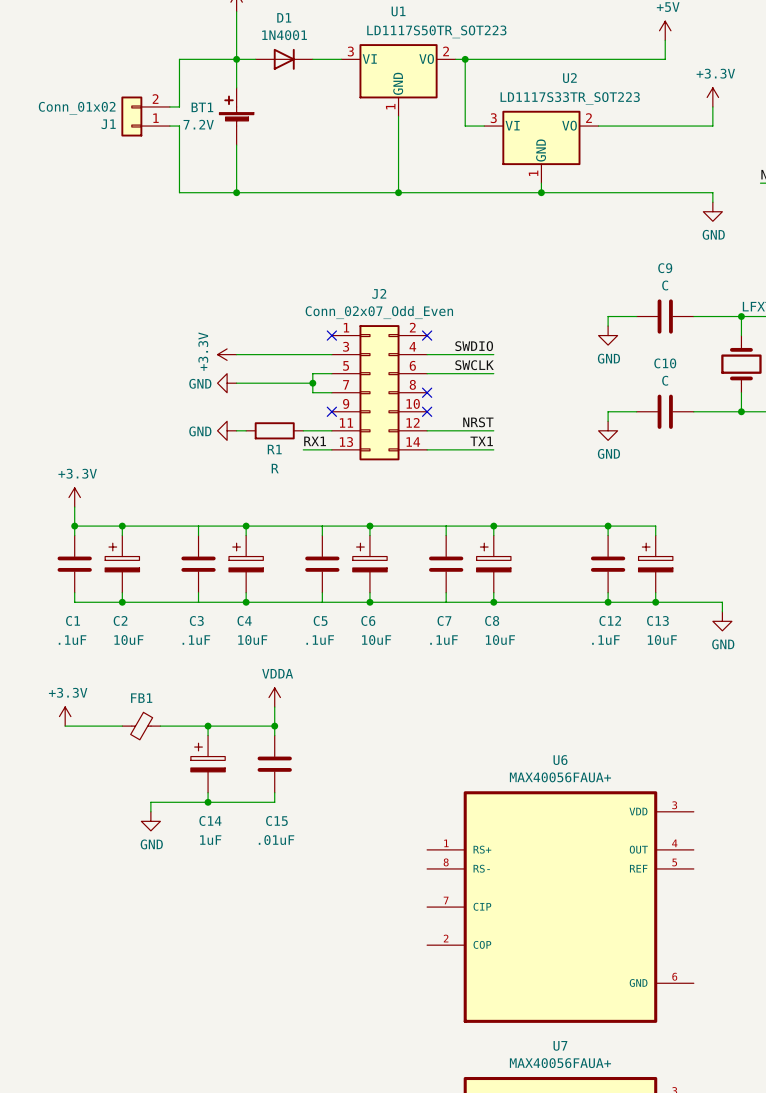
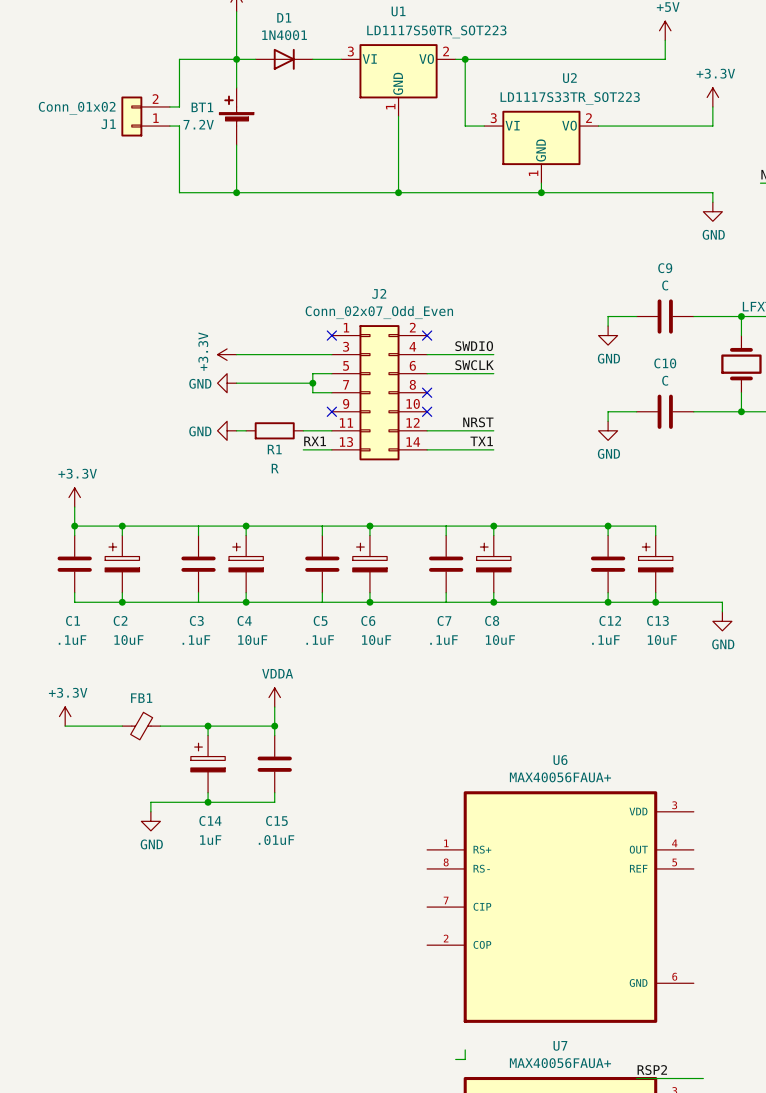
wire: none -> (465, 1049) (465, 1059) (455, 1059)
label: none -> RSP2 (652, 1070)
wire: none -> (636, 1078) (703, 1078)

